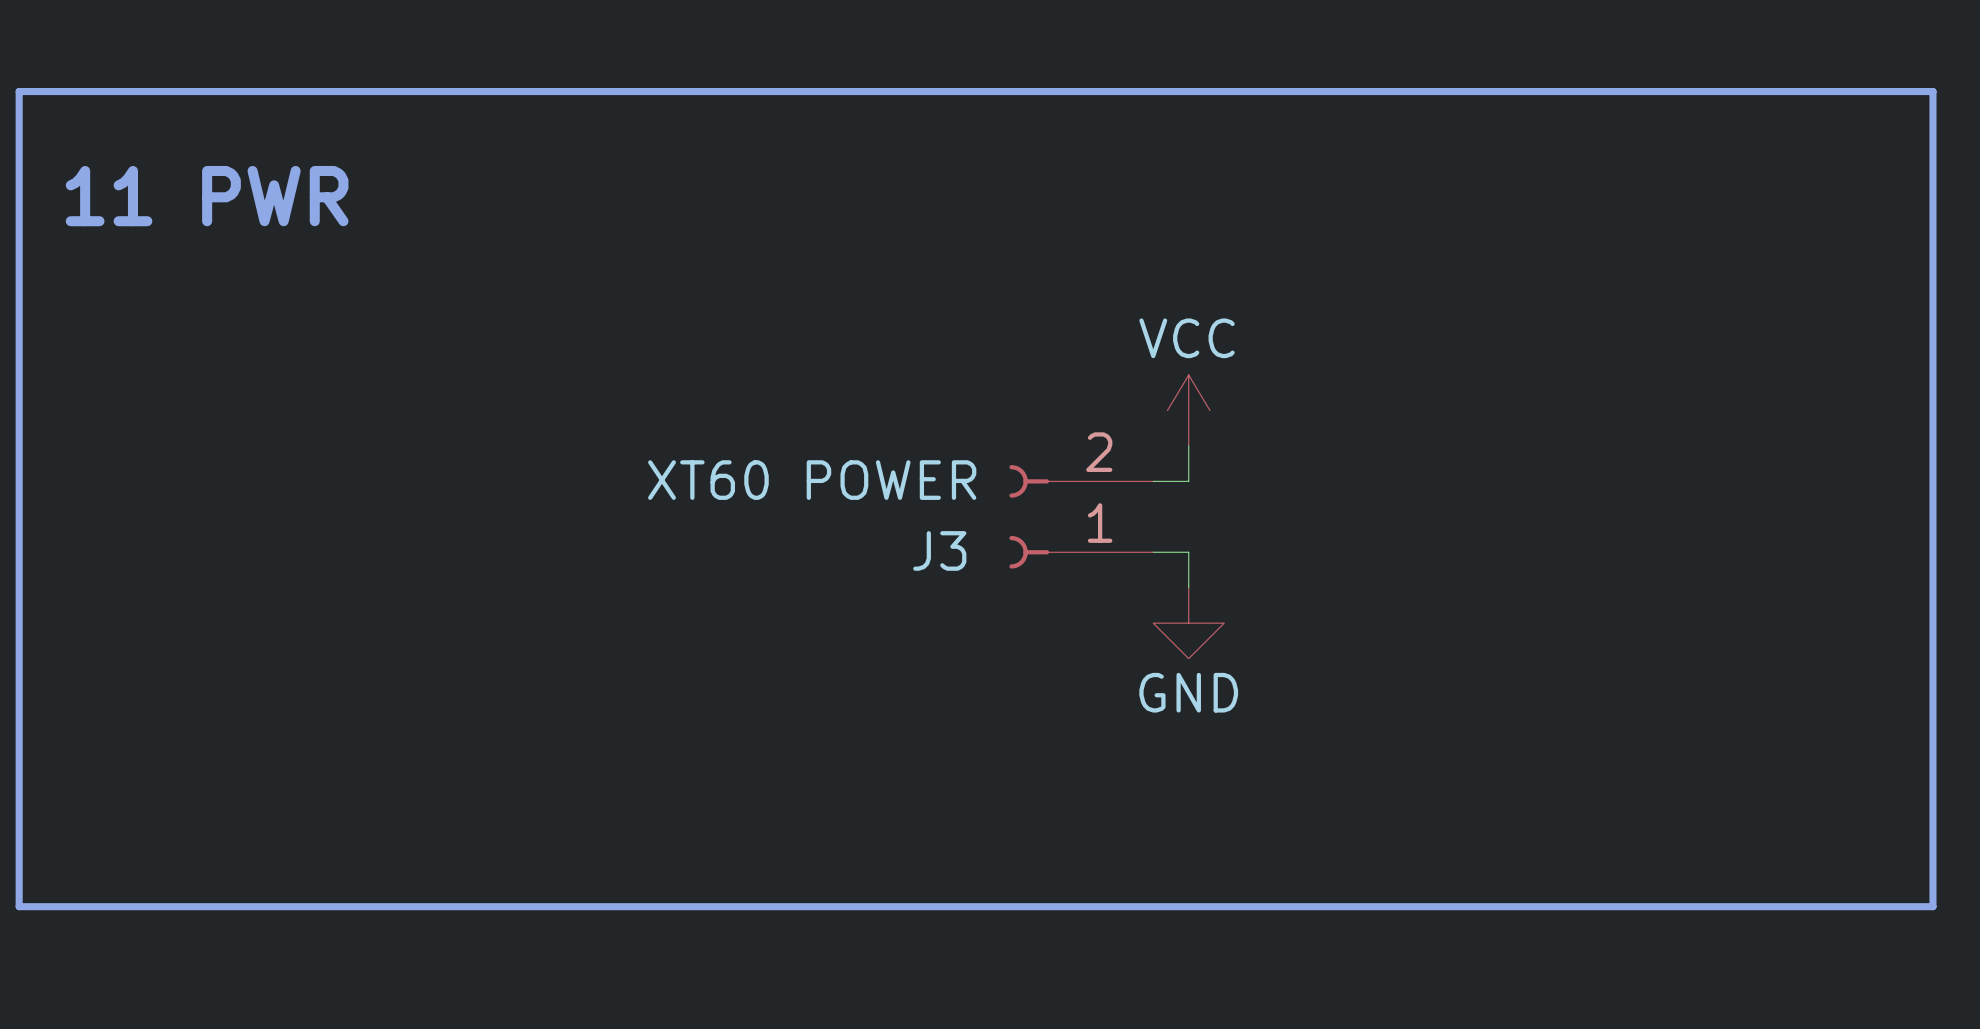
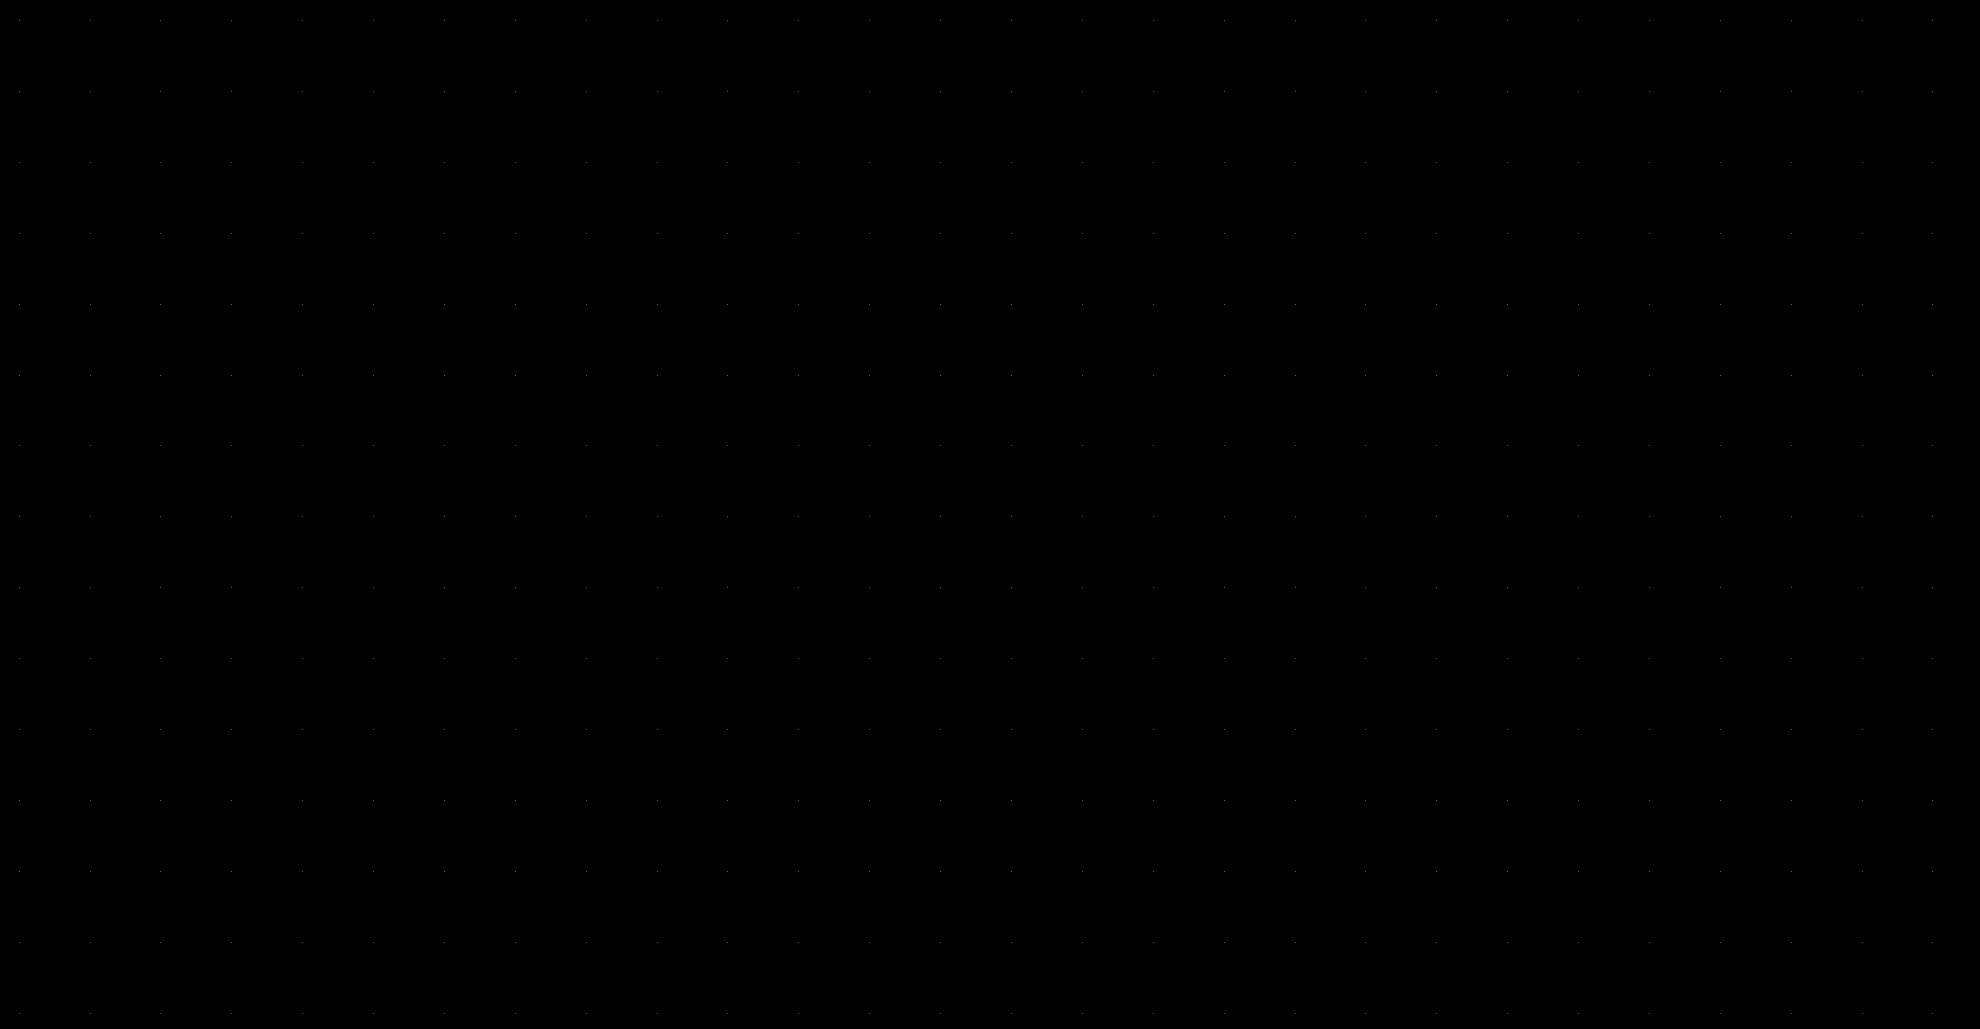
line: (19, 91) (1932, 91) (1932, 906) (19, 906) (19, 91) -> none
text: 11 PWR (207, 196) -> none
power symbol: VCC (1188, 410) -> none
wire: (1188, 445) (1188, 481) (1153, 481) -> none
J3: XT60 POWER (1081, 516) -> none
wire: (1153, 552) (1188, 552) (1188, 587) -> none
power symbol: GND (1188, 623) -> none

